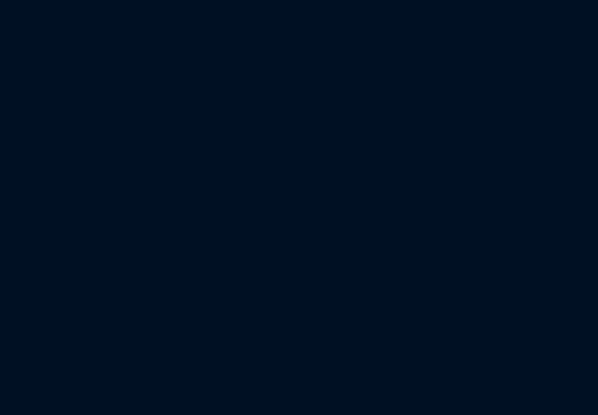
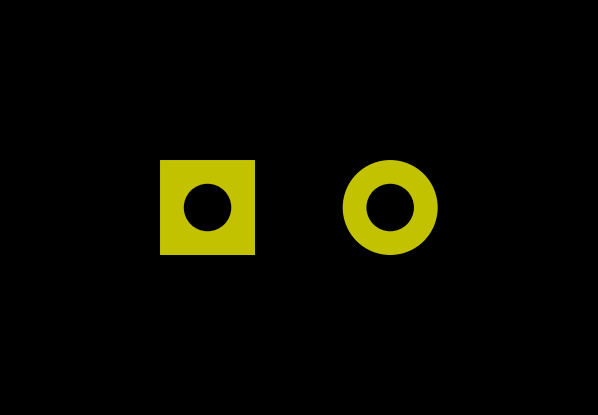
part: none -> (298, 207)

